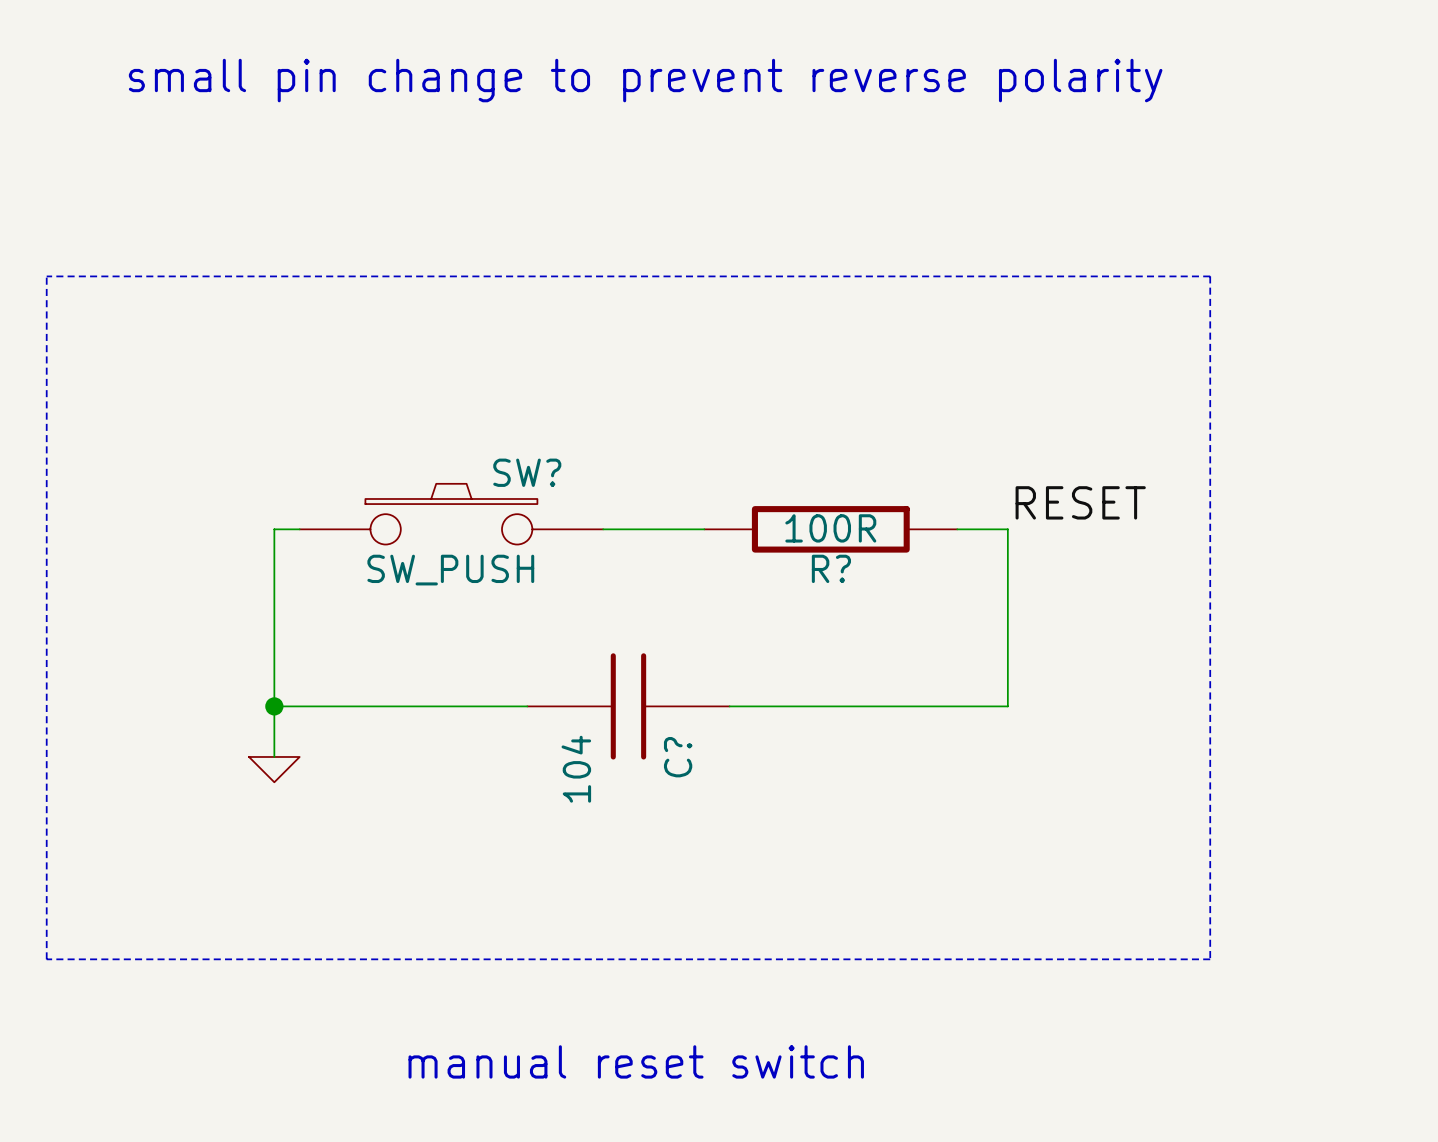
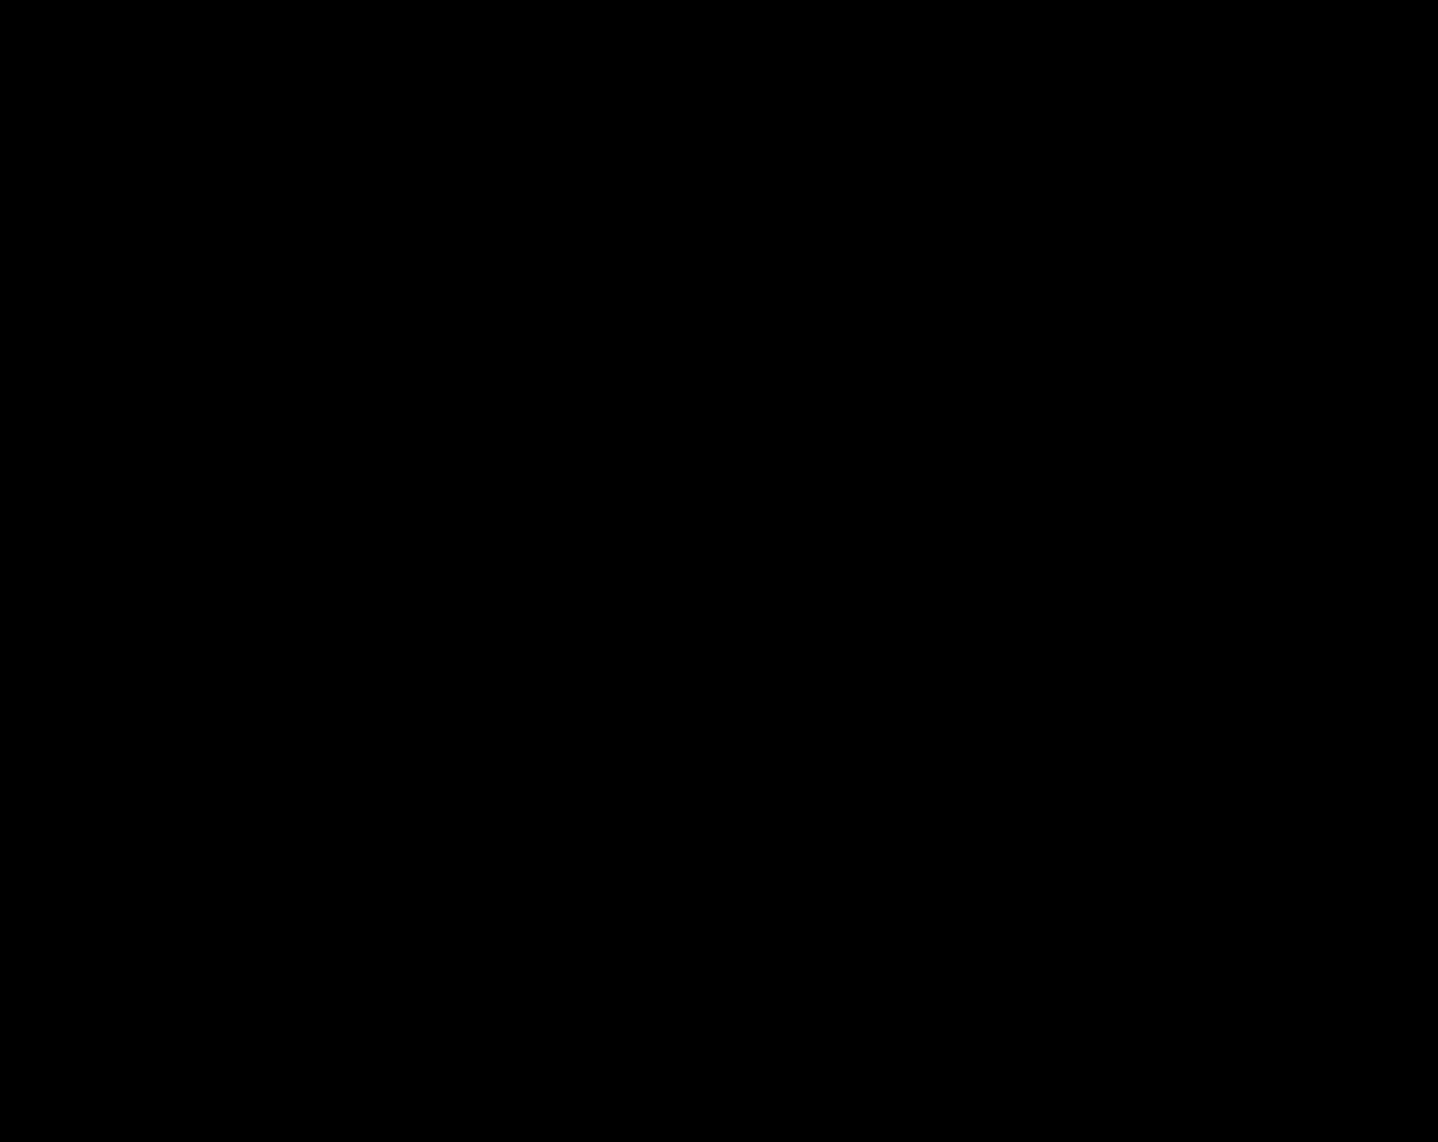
text: small pin change to prevent reverse polarity (645, 80) -> none
line: (46, 276) (1210, 276) (1210, 959) (46, 959) (46, 276) -> none
label: RESET (1080, 502) -> none
SW?: SW_PUSH (451, 514) -> none
wire: (299, 529) (274, 529) (274, 756) -> none
wire: (603, 529) (704, 529) -> none
R?: 100R (830, 529) -> none
wire: (957, 529) (1007, 529) (1007, 706) (729, 706) -> none
wire: (274, 706) (527, 706) -> none
junction: (274, 706) -> none
C?: 104 (628, 706) -> none
power symbol: (274, 769) -> none
text: manual reset switch (636, 1061) -> none

